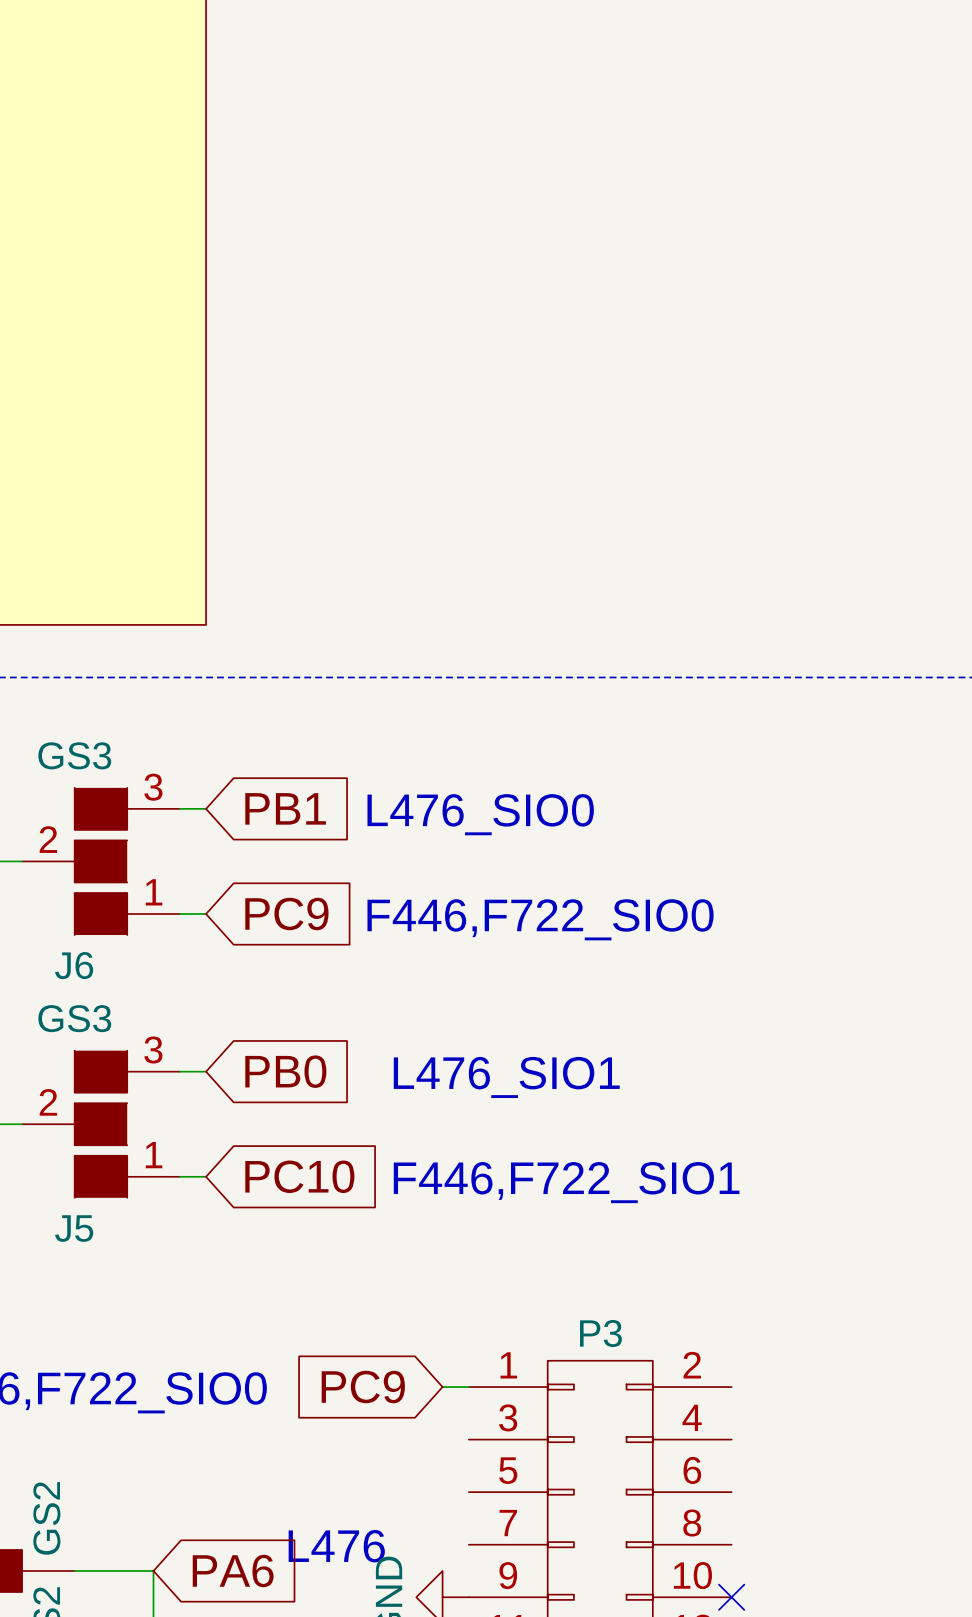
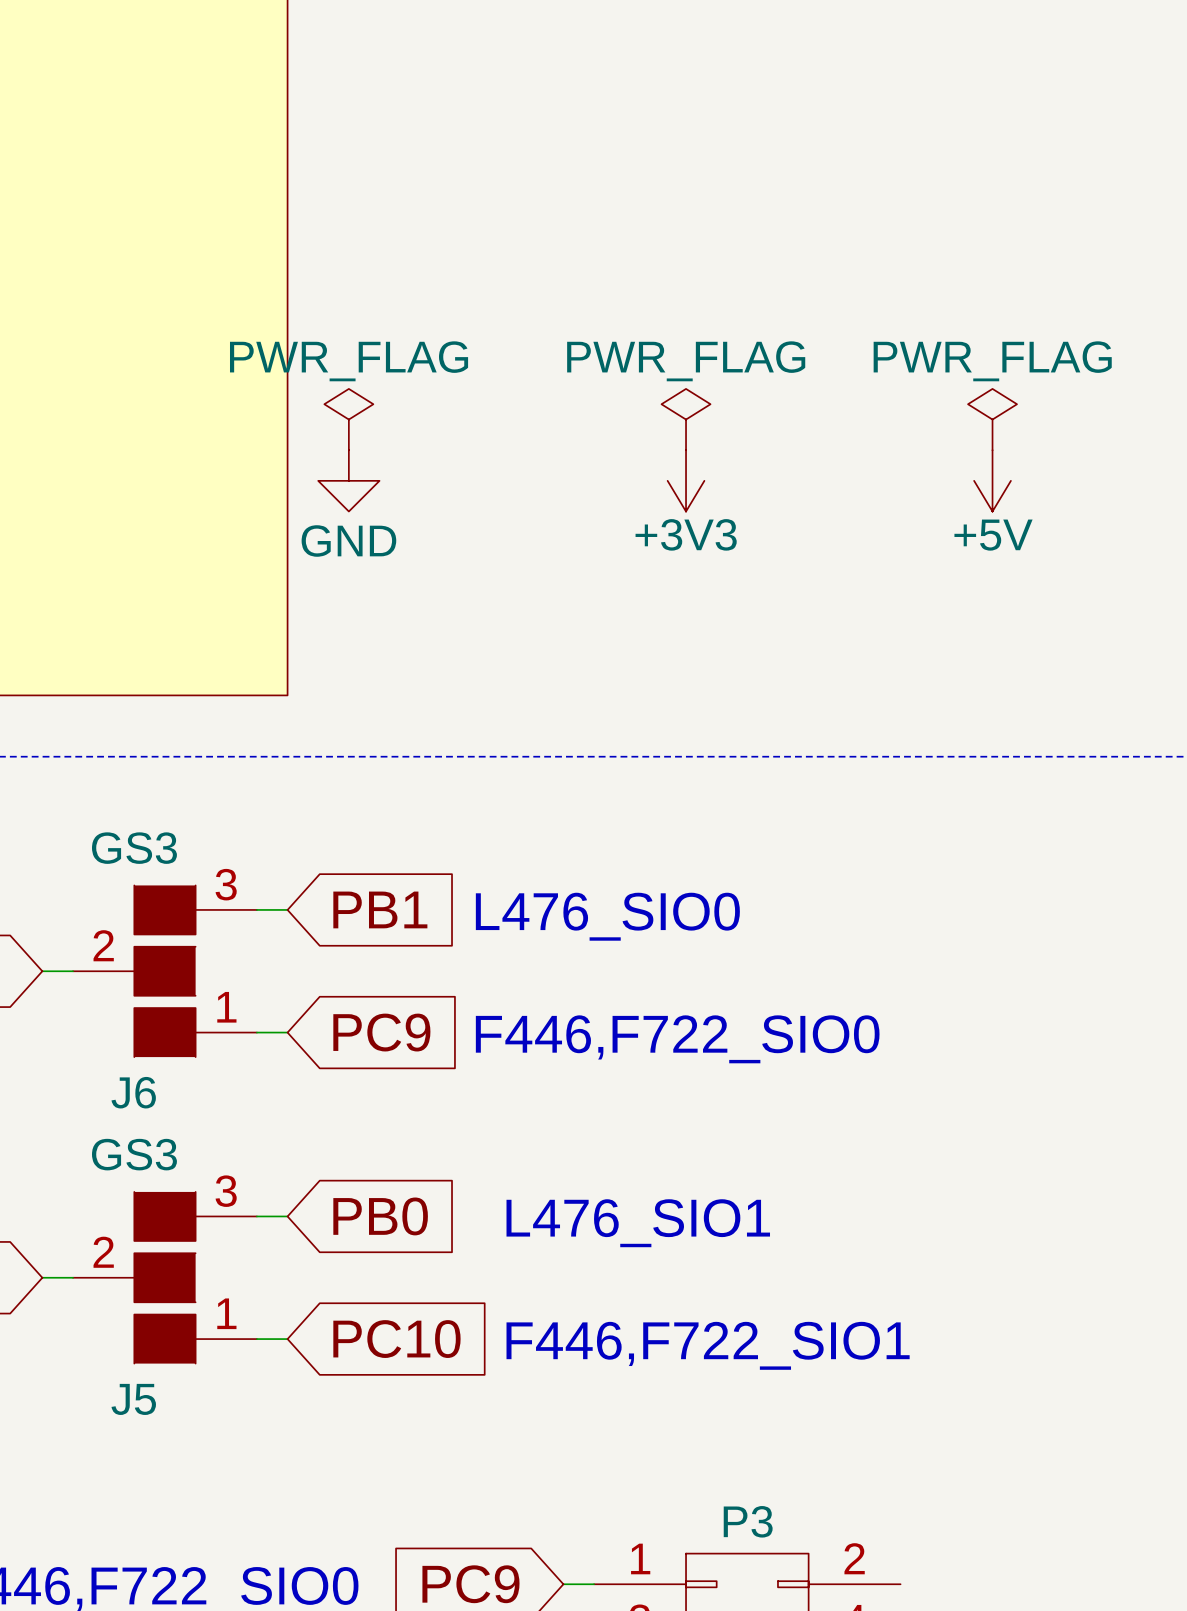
power symbol: none -> PWR_FLAG (348, 419)
power symbol: none -> PWR_FLAG (686, 419)
power symbol: none -> PWR_FLAG (992, 419)
power symbol: none -> GND (348, 480)
power symbol: none -> +3V3 (686, 480)
power symbol: none -> +5V (992, 480)

